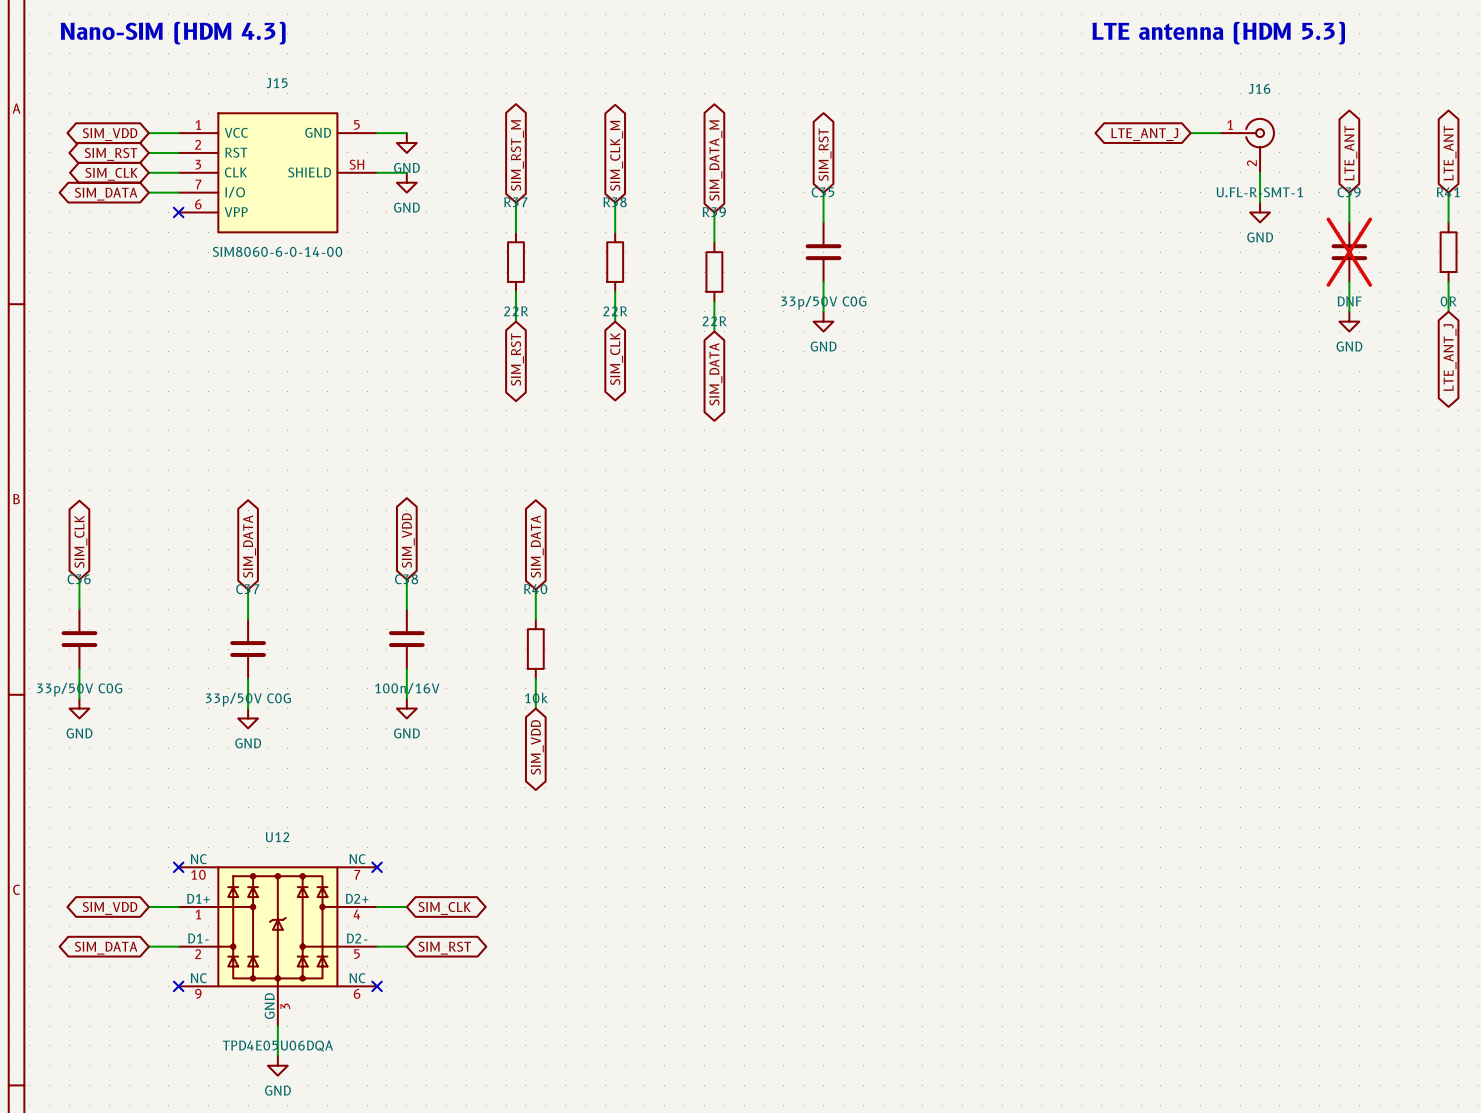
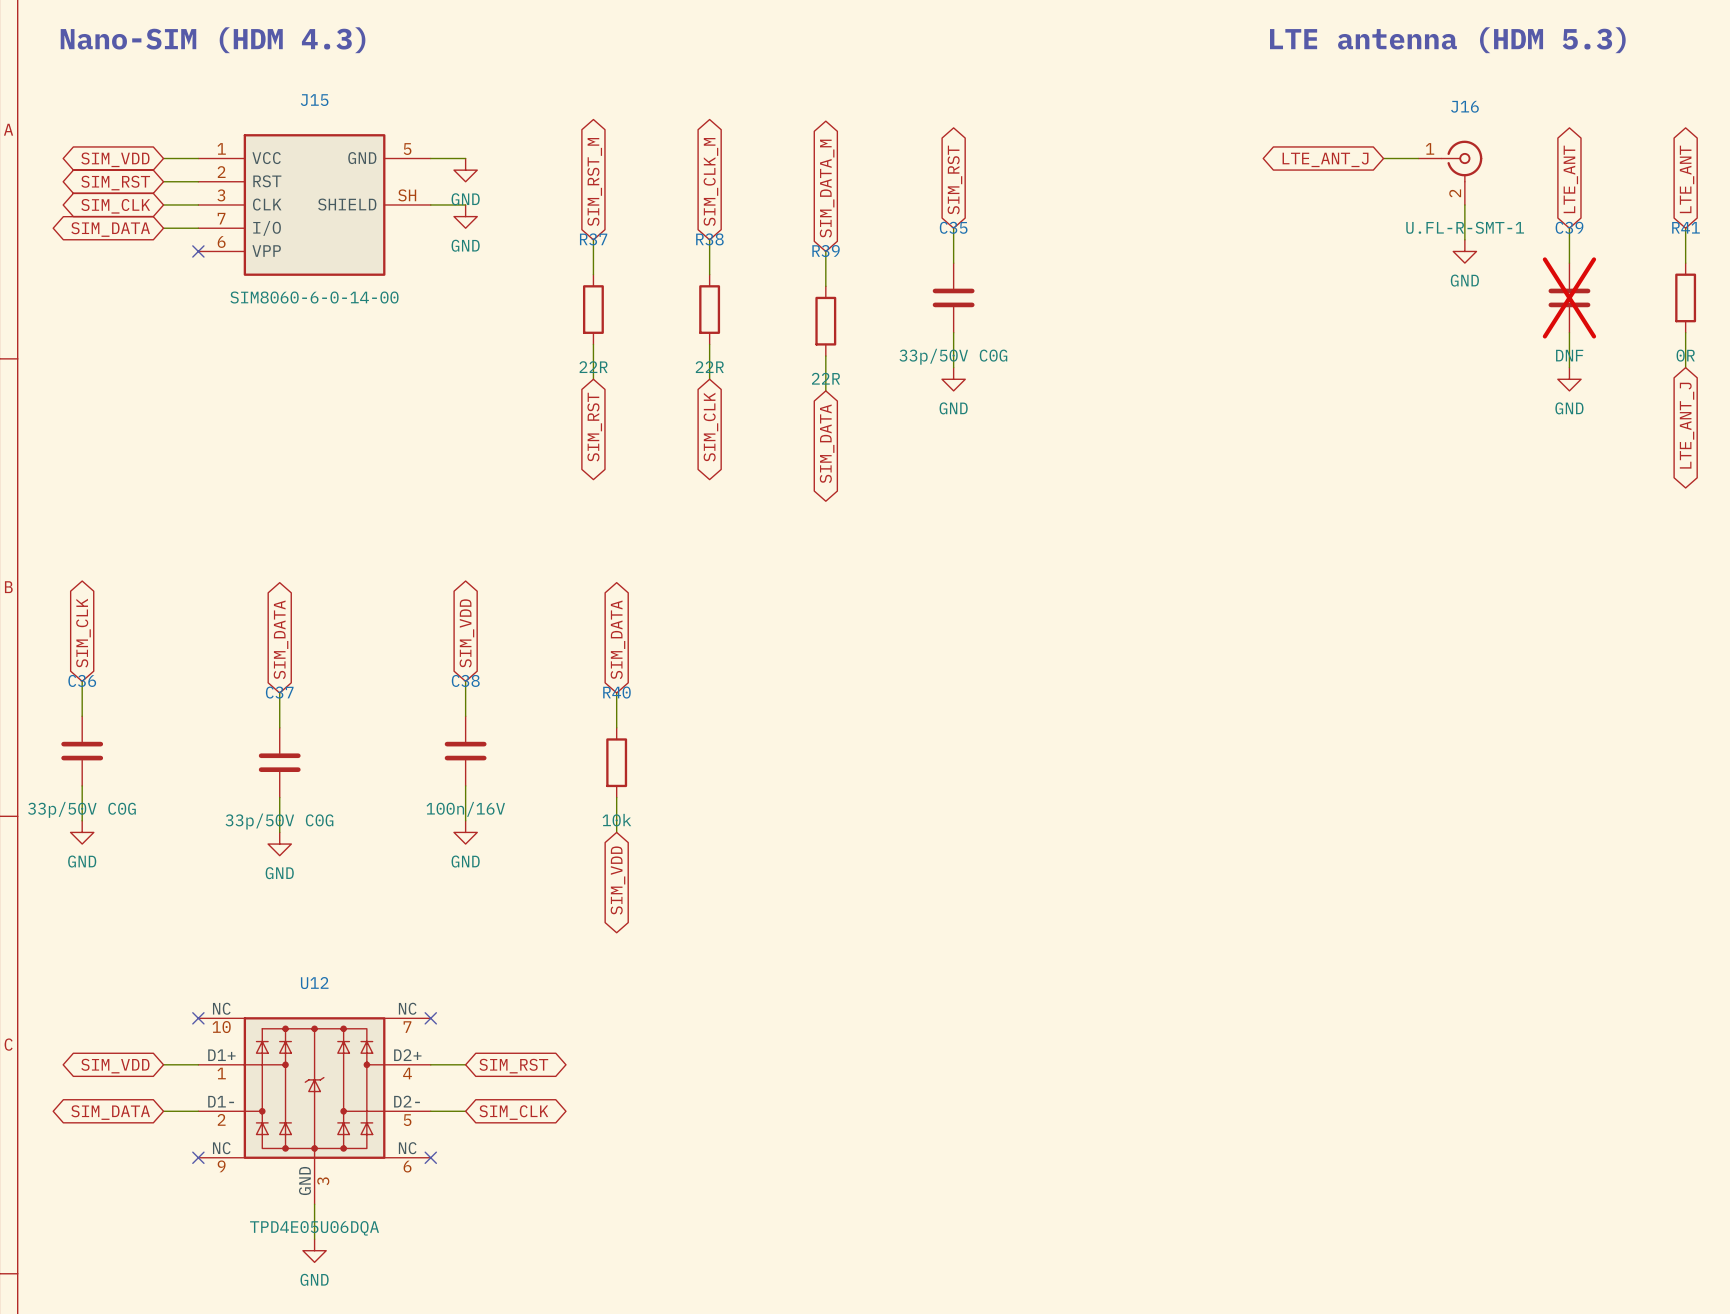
global label: SIM_CLK (444, 908) -> SIM_RST (513, 1066)
global label: SIM_RST (444, 948) -> SIM_CLK (513, 1112)

